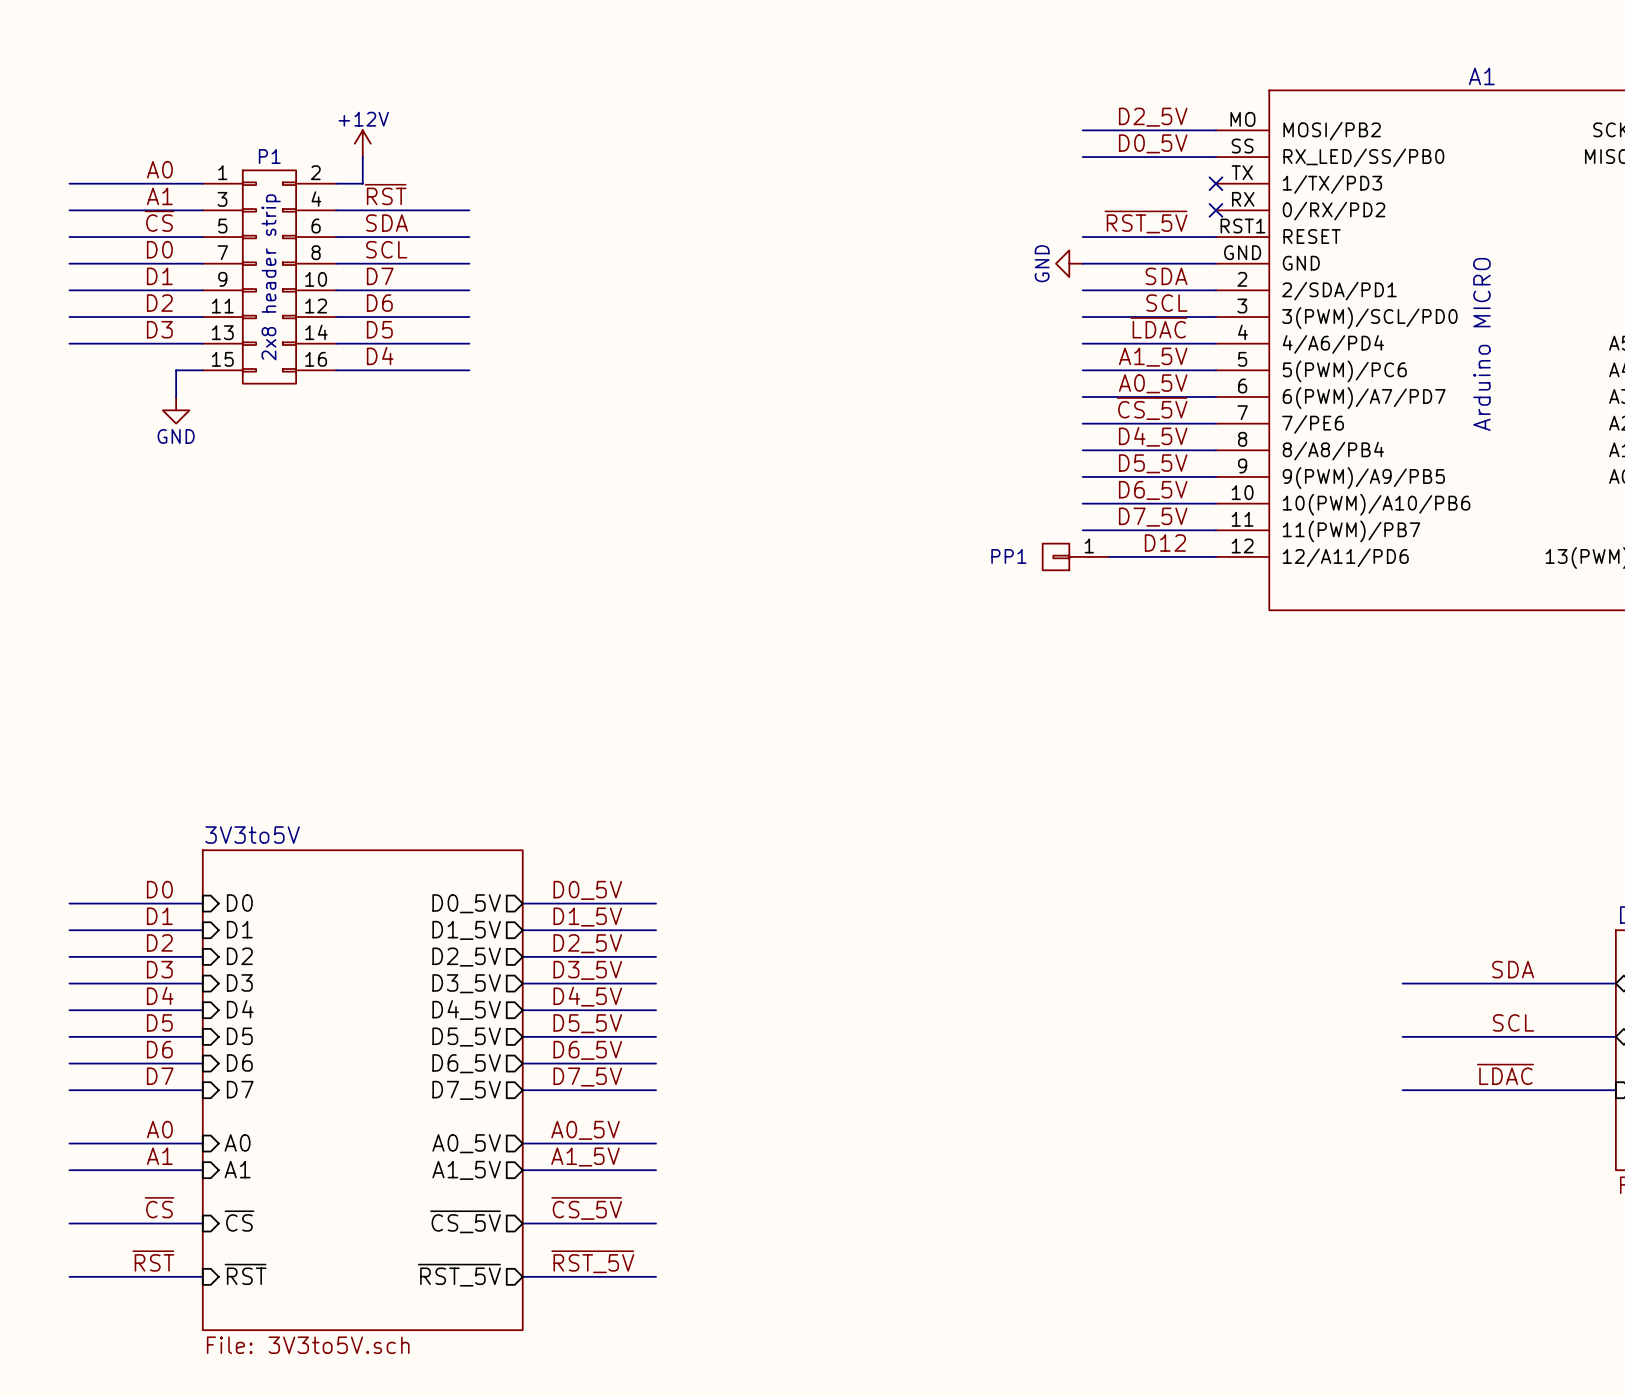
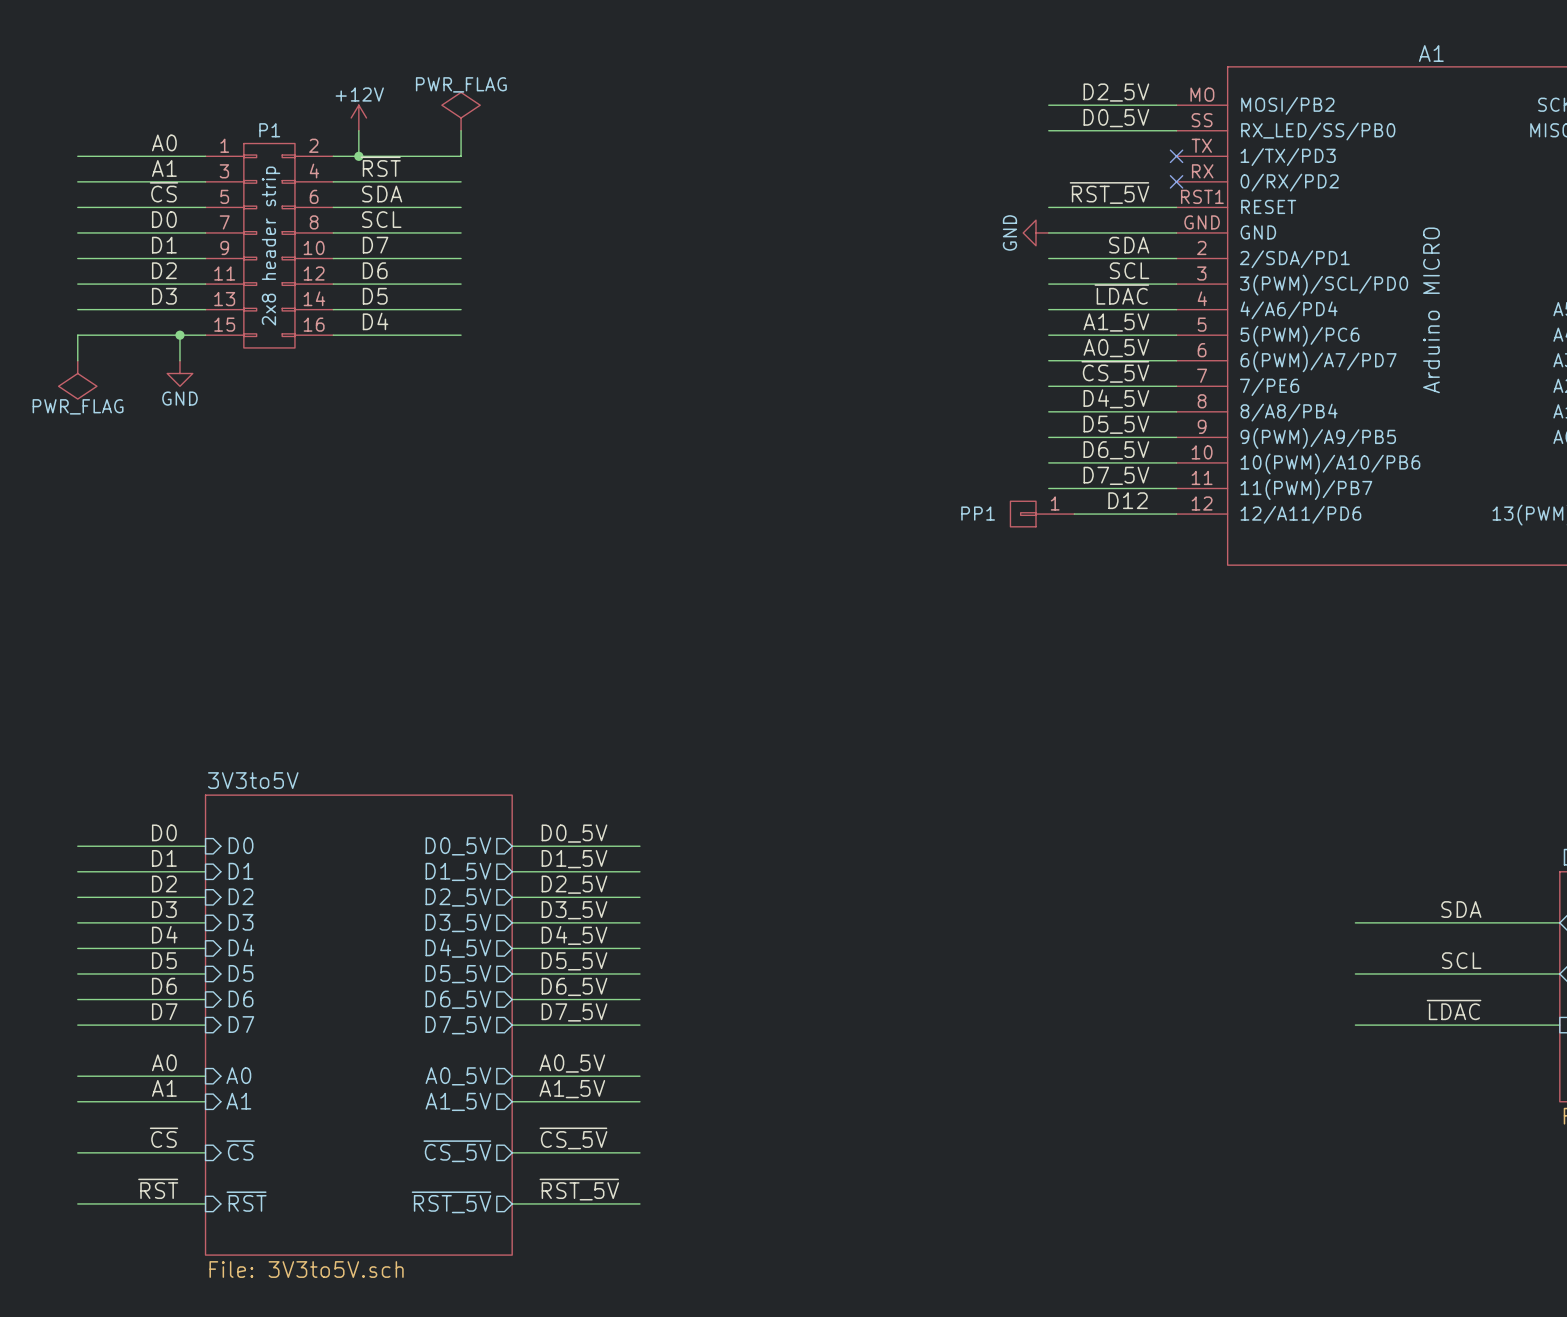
power symbol: none -> PWR_FLAG (461, 111)
wire: none -> (461, 130) (461, 156) (358, 156)
junction: none -> (358, 156)
wire: none -> (179, 335) (77, 335) (77, 360)
junction: none -> (179, 335)
power symbol: none -> PWR_FLAG (77, 379)

